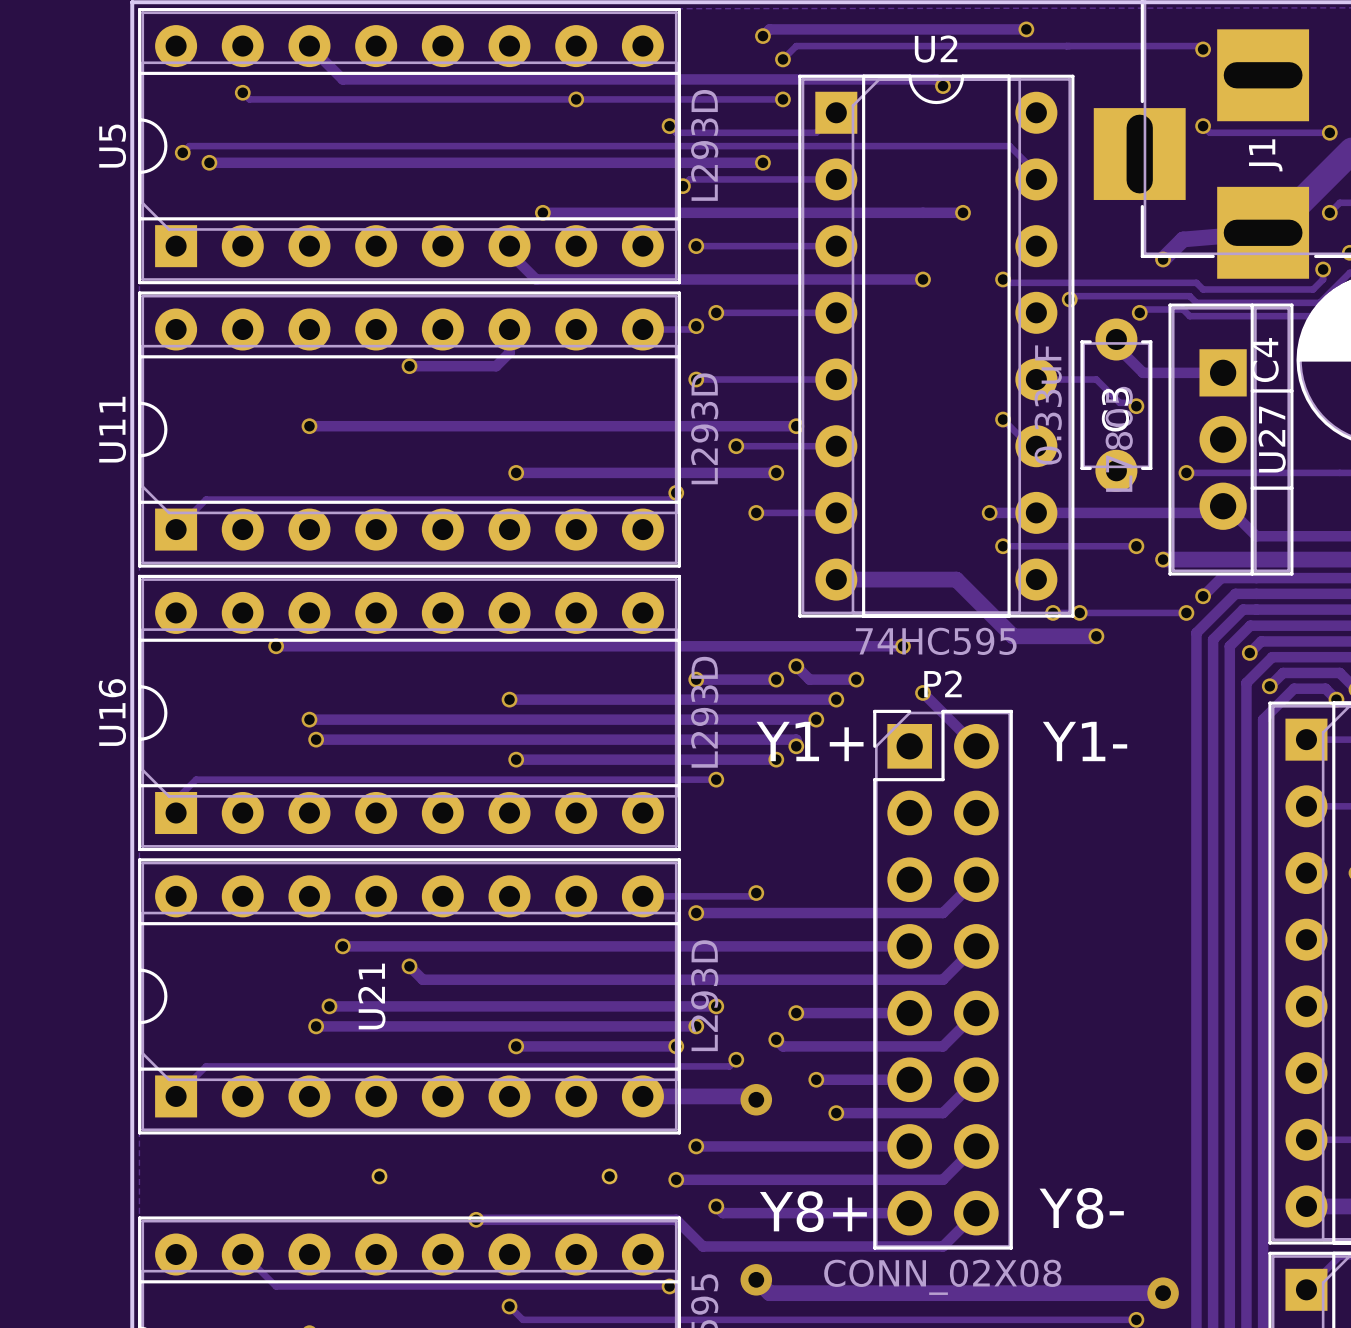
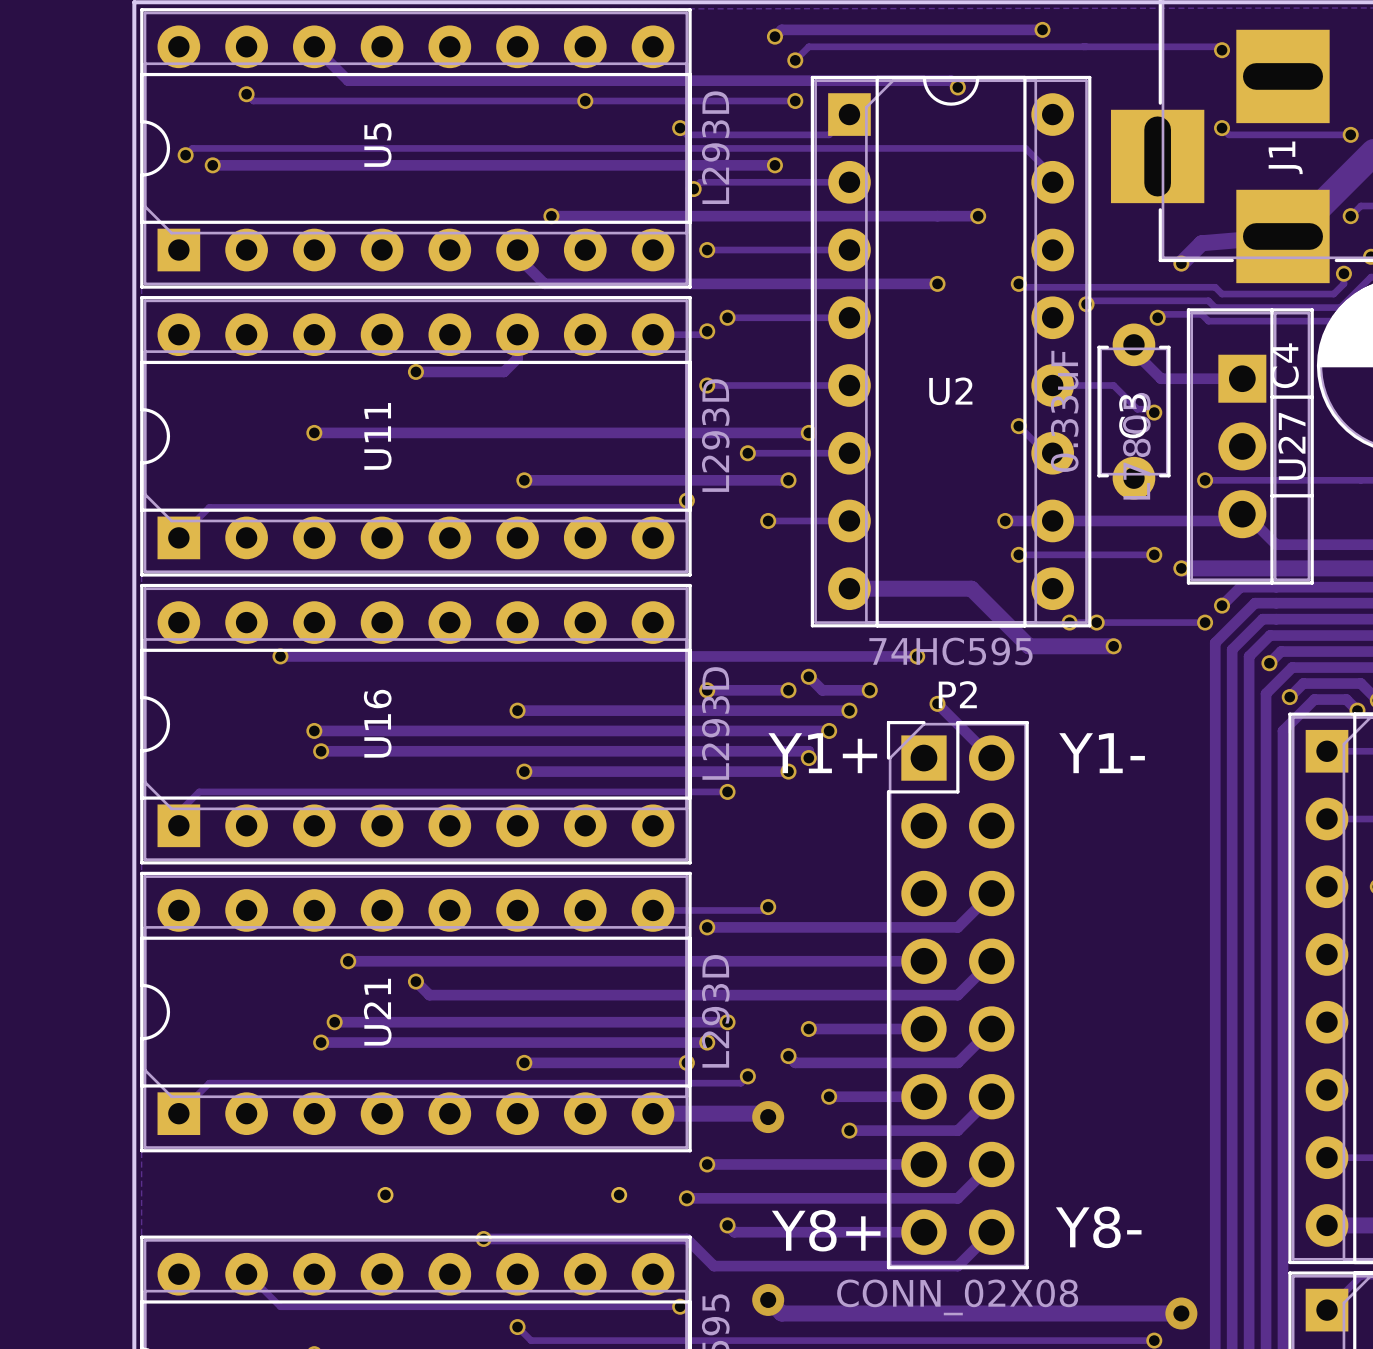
U2 name position: U2 (936, 49) -> U2 (950, 391)
U5 name position: U5 (112, 146) -> U5 (377, 145)
U11 name position: U11 (112, 429) -> U11 (377, 436)
U16 name position: U16 (112, 712) -> U16 (377, 723)

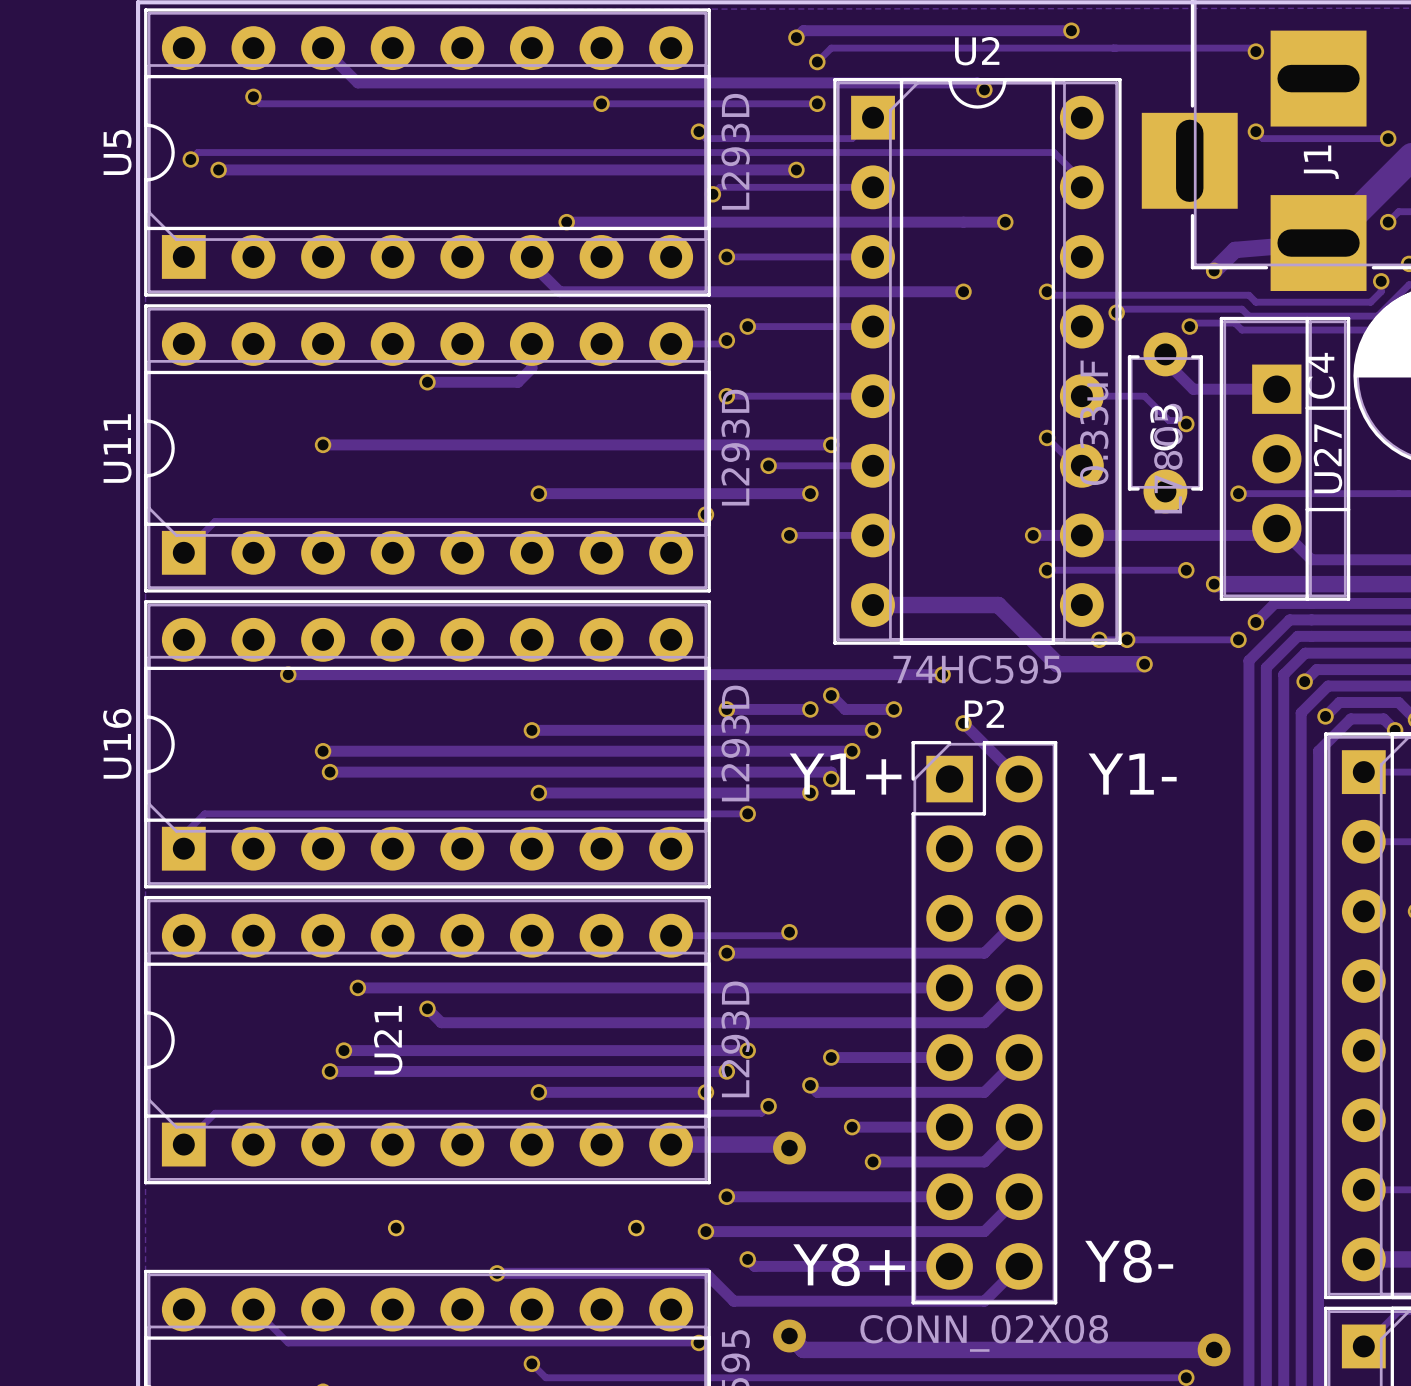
U5 name position: U5 (377, 145) -> U5 (117, 152)
U2 name position: U2 (950, 391) -> U2 (977, 51)
U11 name position: U11 (377, 436) -> U11 (117, 448)
U16 name position: U16 (377, 723) -> U16 (117, 743)

